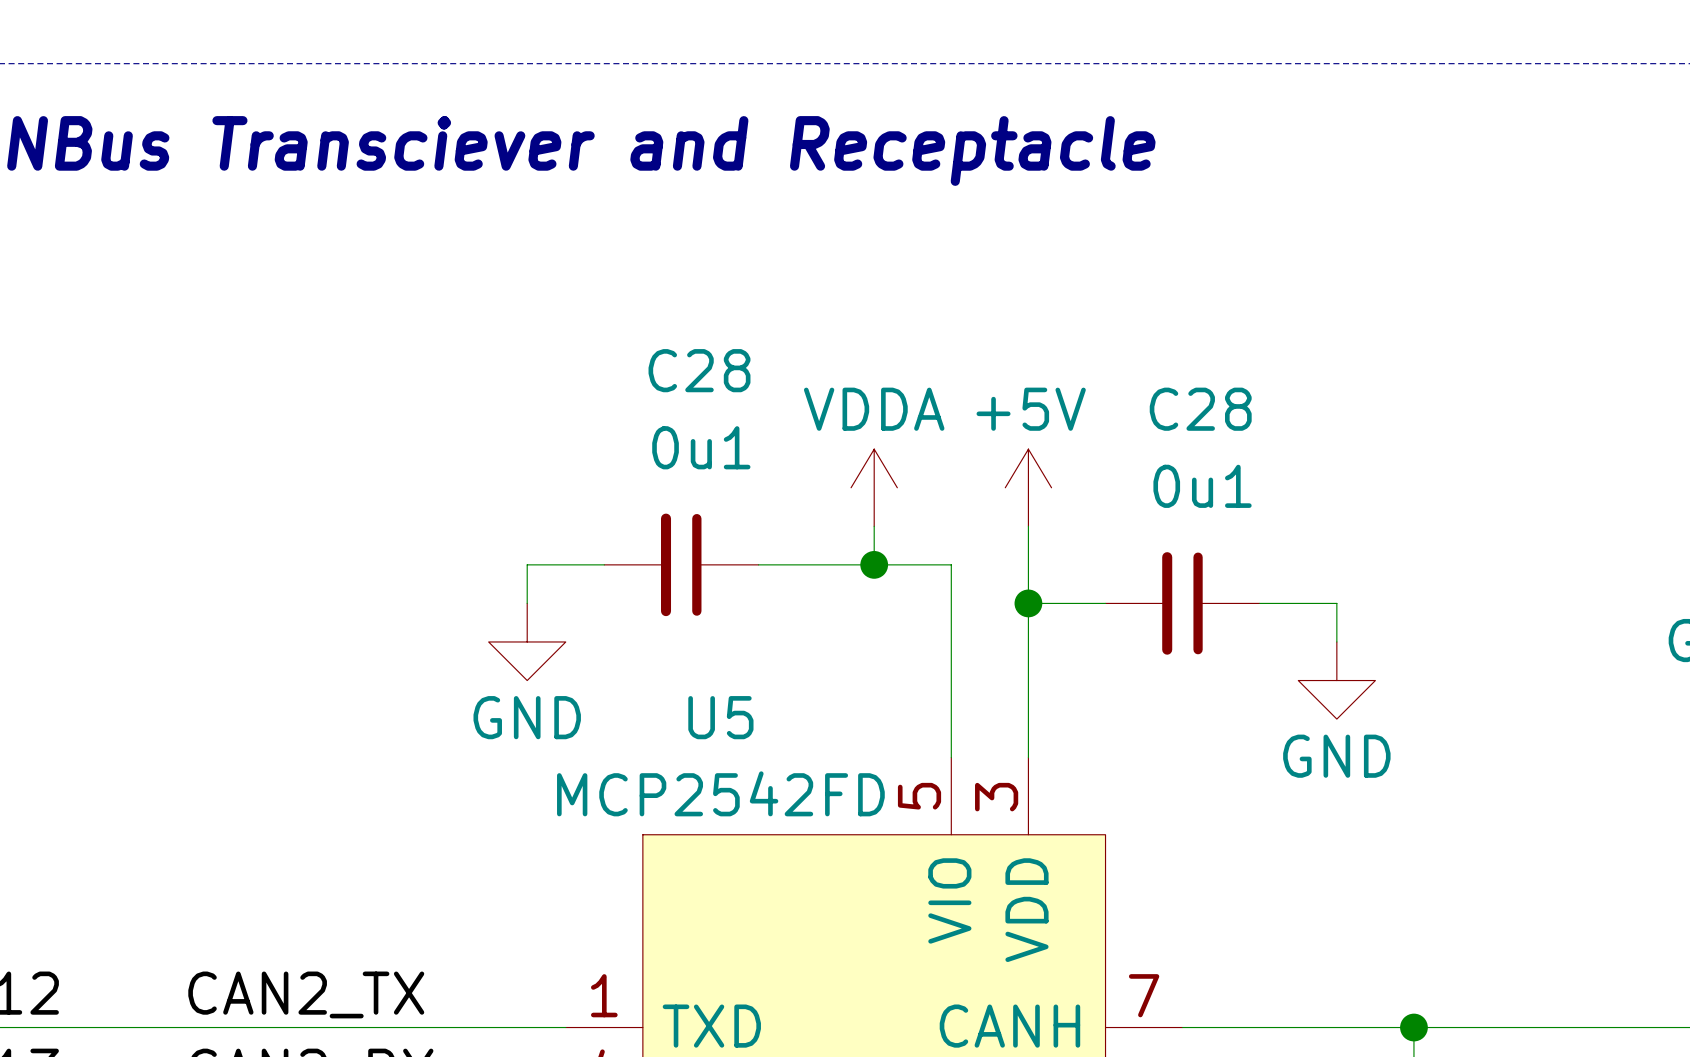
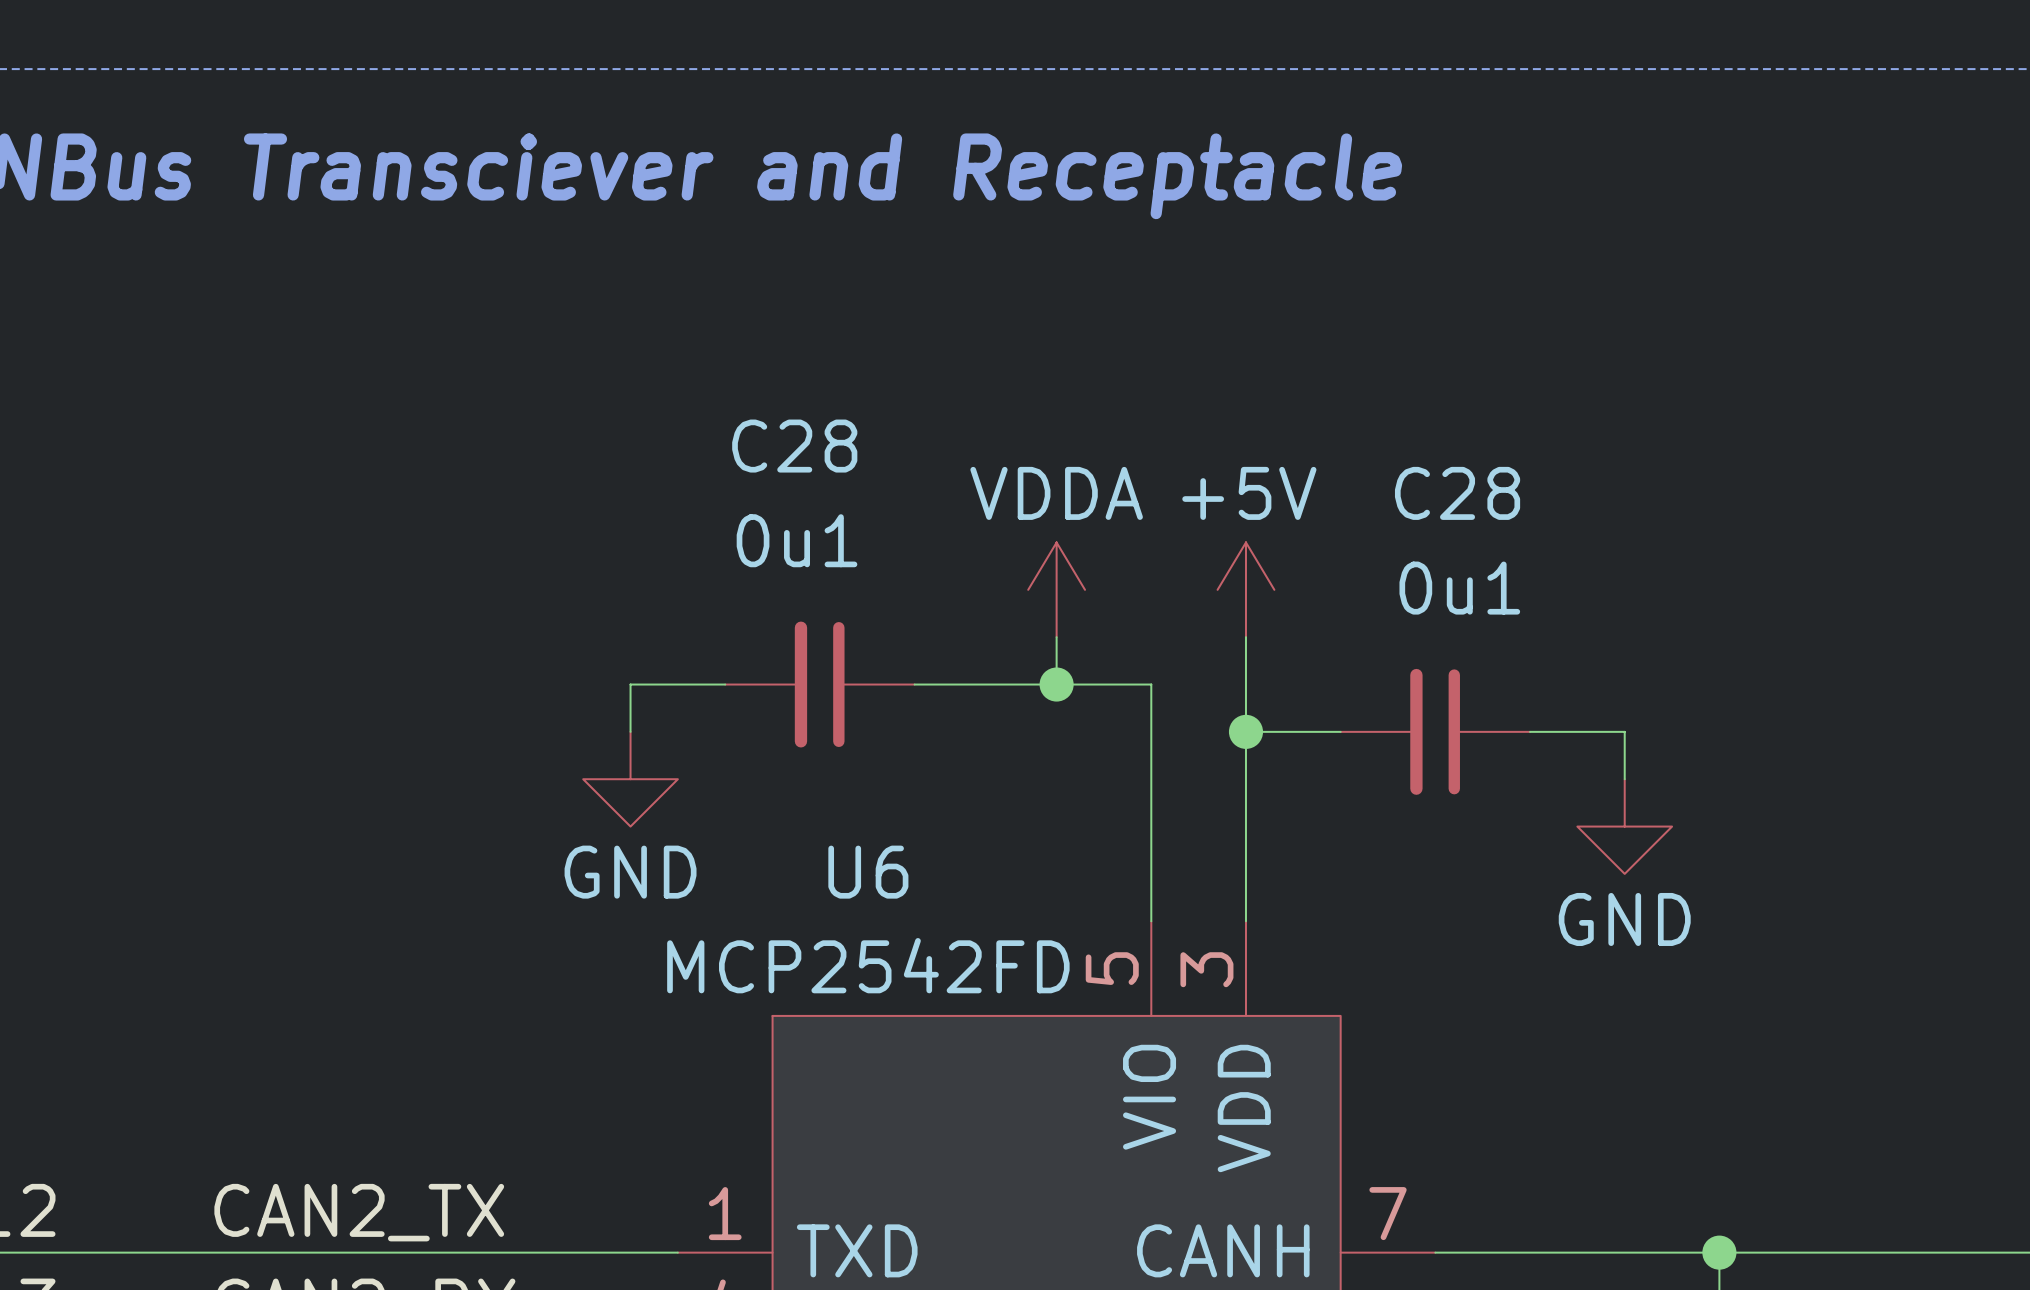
C28 name position: C28 (699, 370) -> C28 (794, 446)
C28 value position: 0u1 (701, 447) -> 0u1 (797, 540)
U5 name: U5 (720, 717) -> U6 (868, 872)

